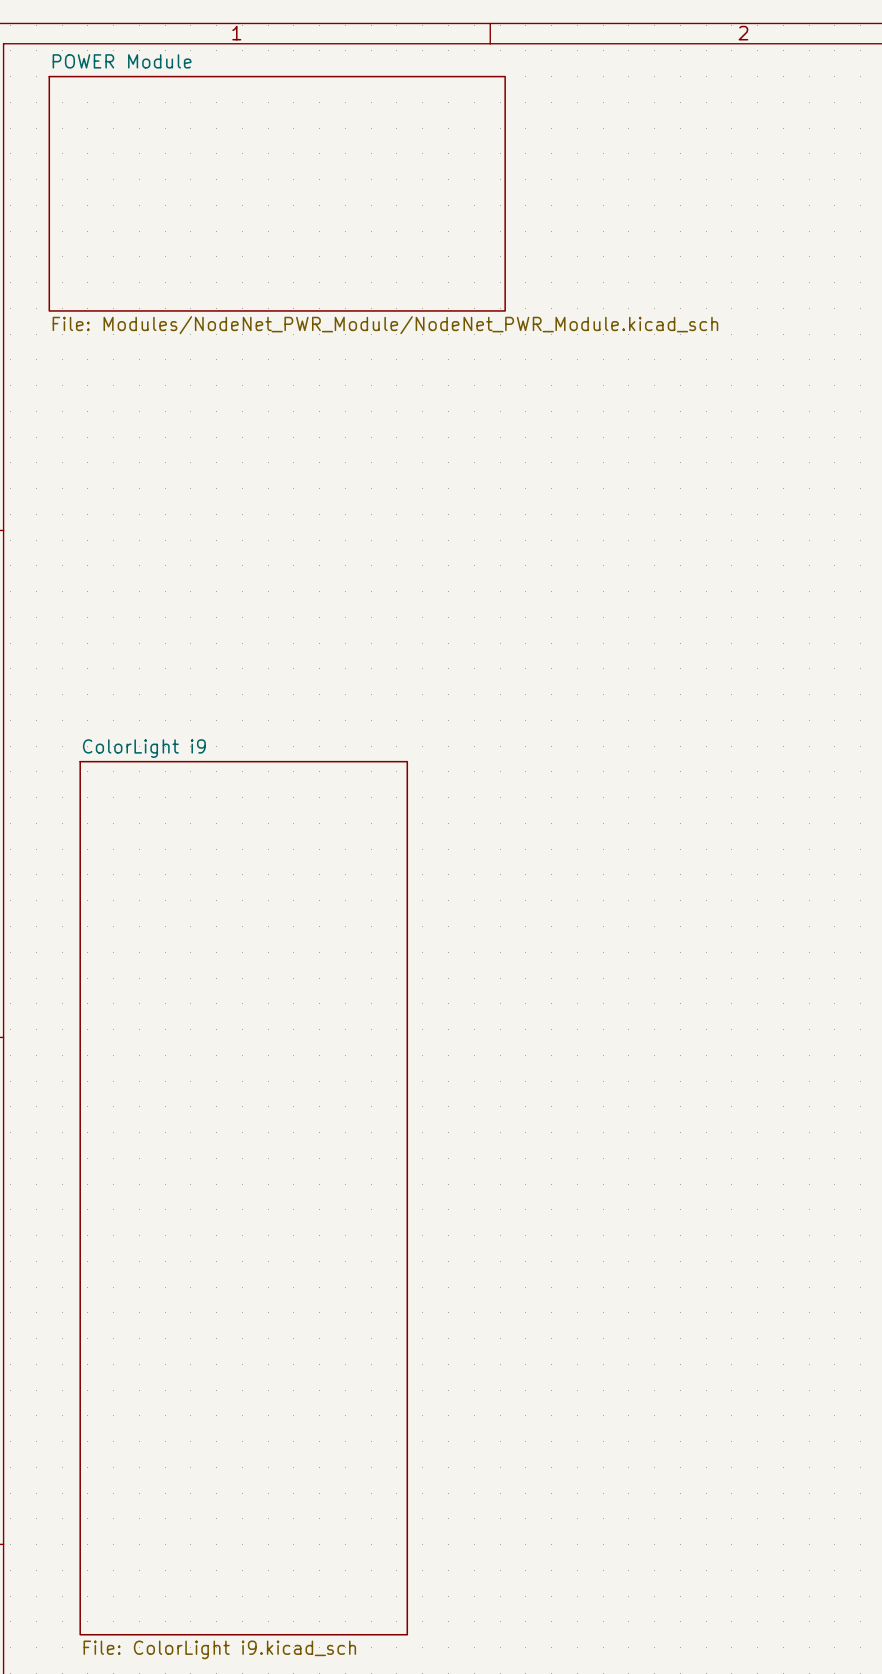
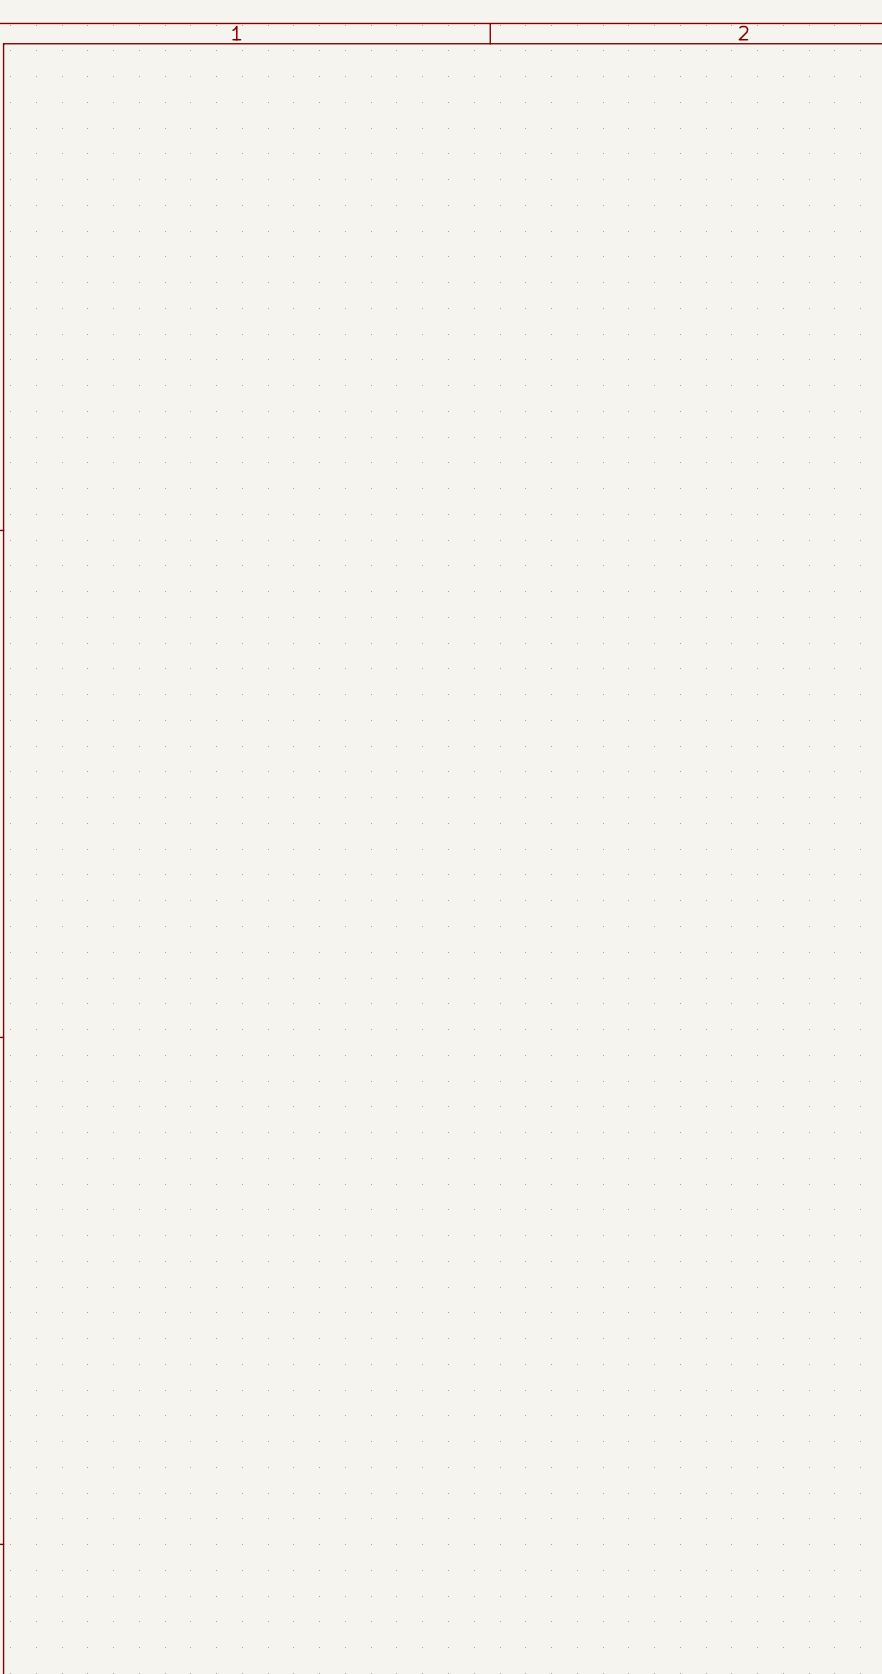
sheet POWER Module: File: Modules/NodeNet_PWR_Module/NodeNet_PWR_Module.kicad_sch (277, 193) -> none
sheet ColorLight i9: File: ColorLight i9.kicad_sch (243, 1198) -> none

